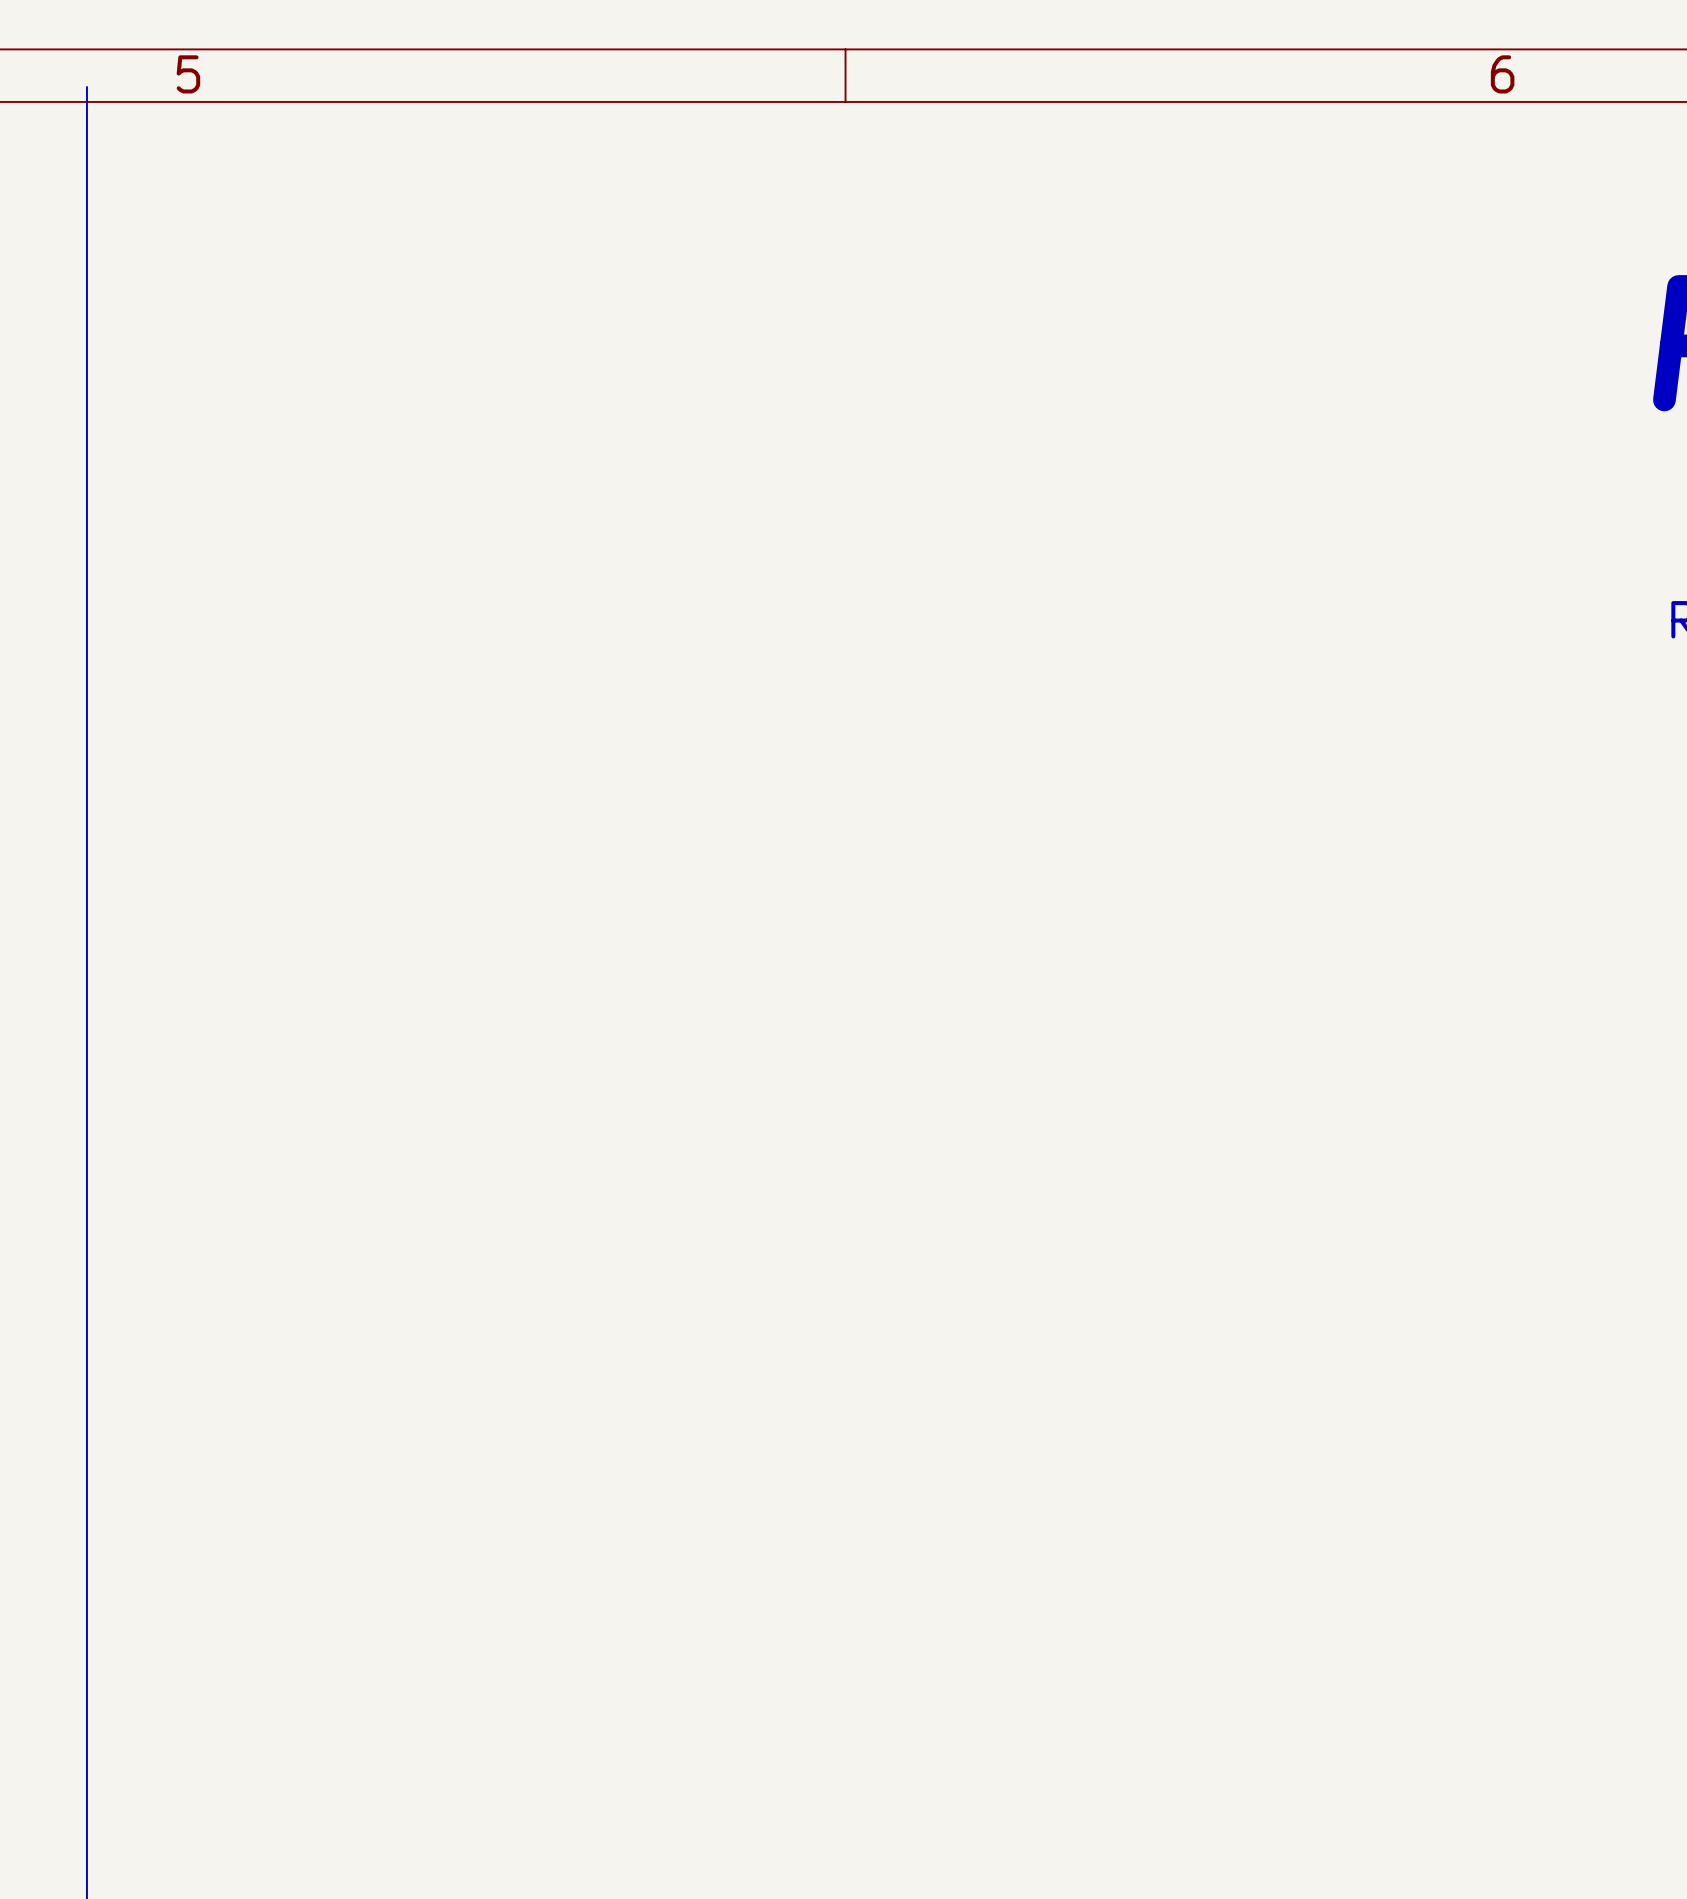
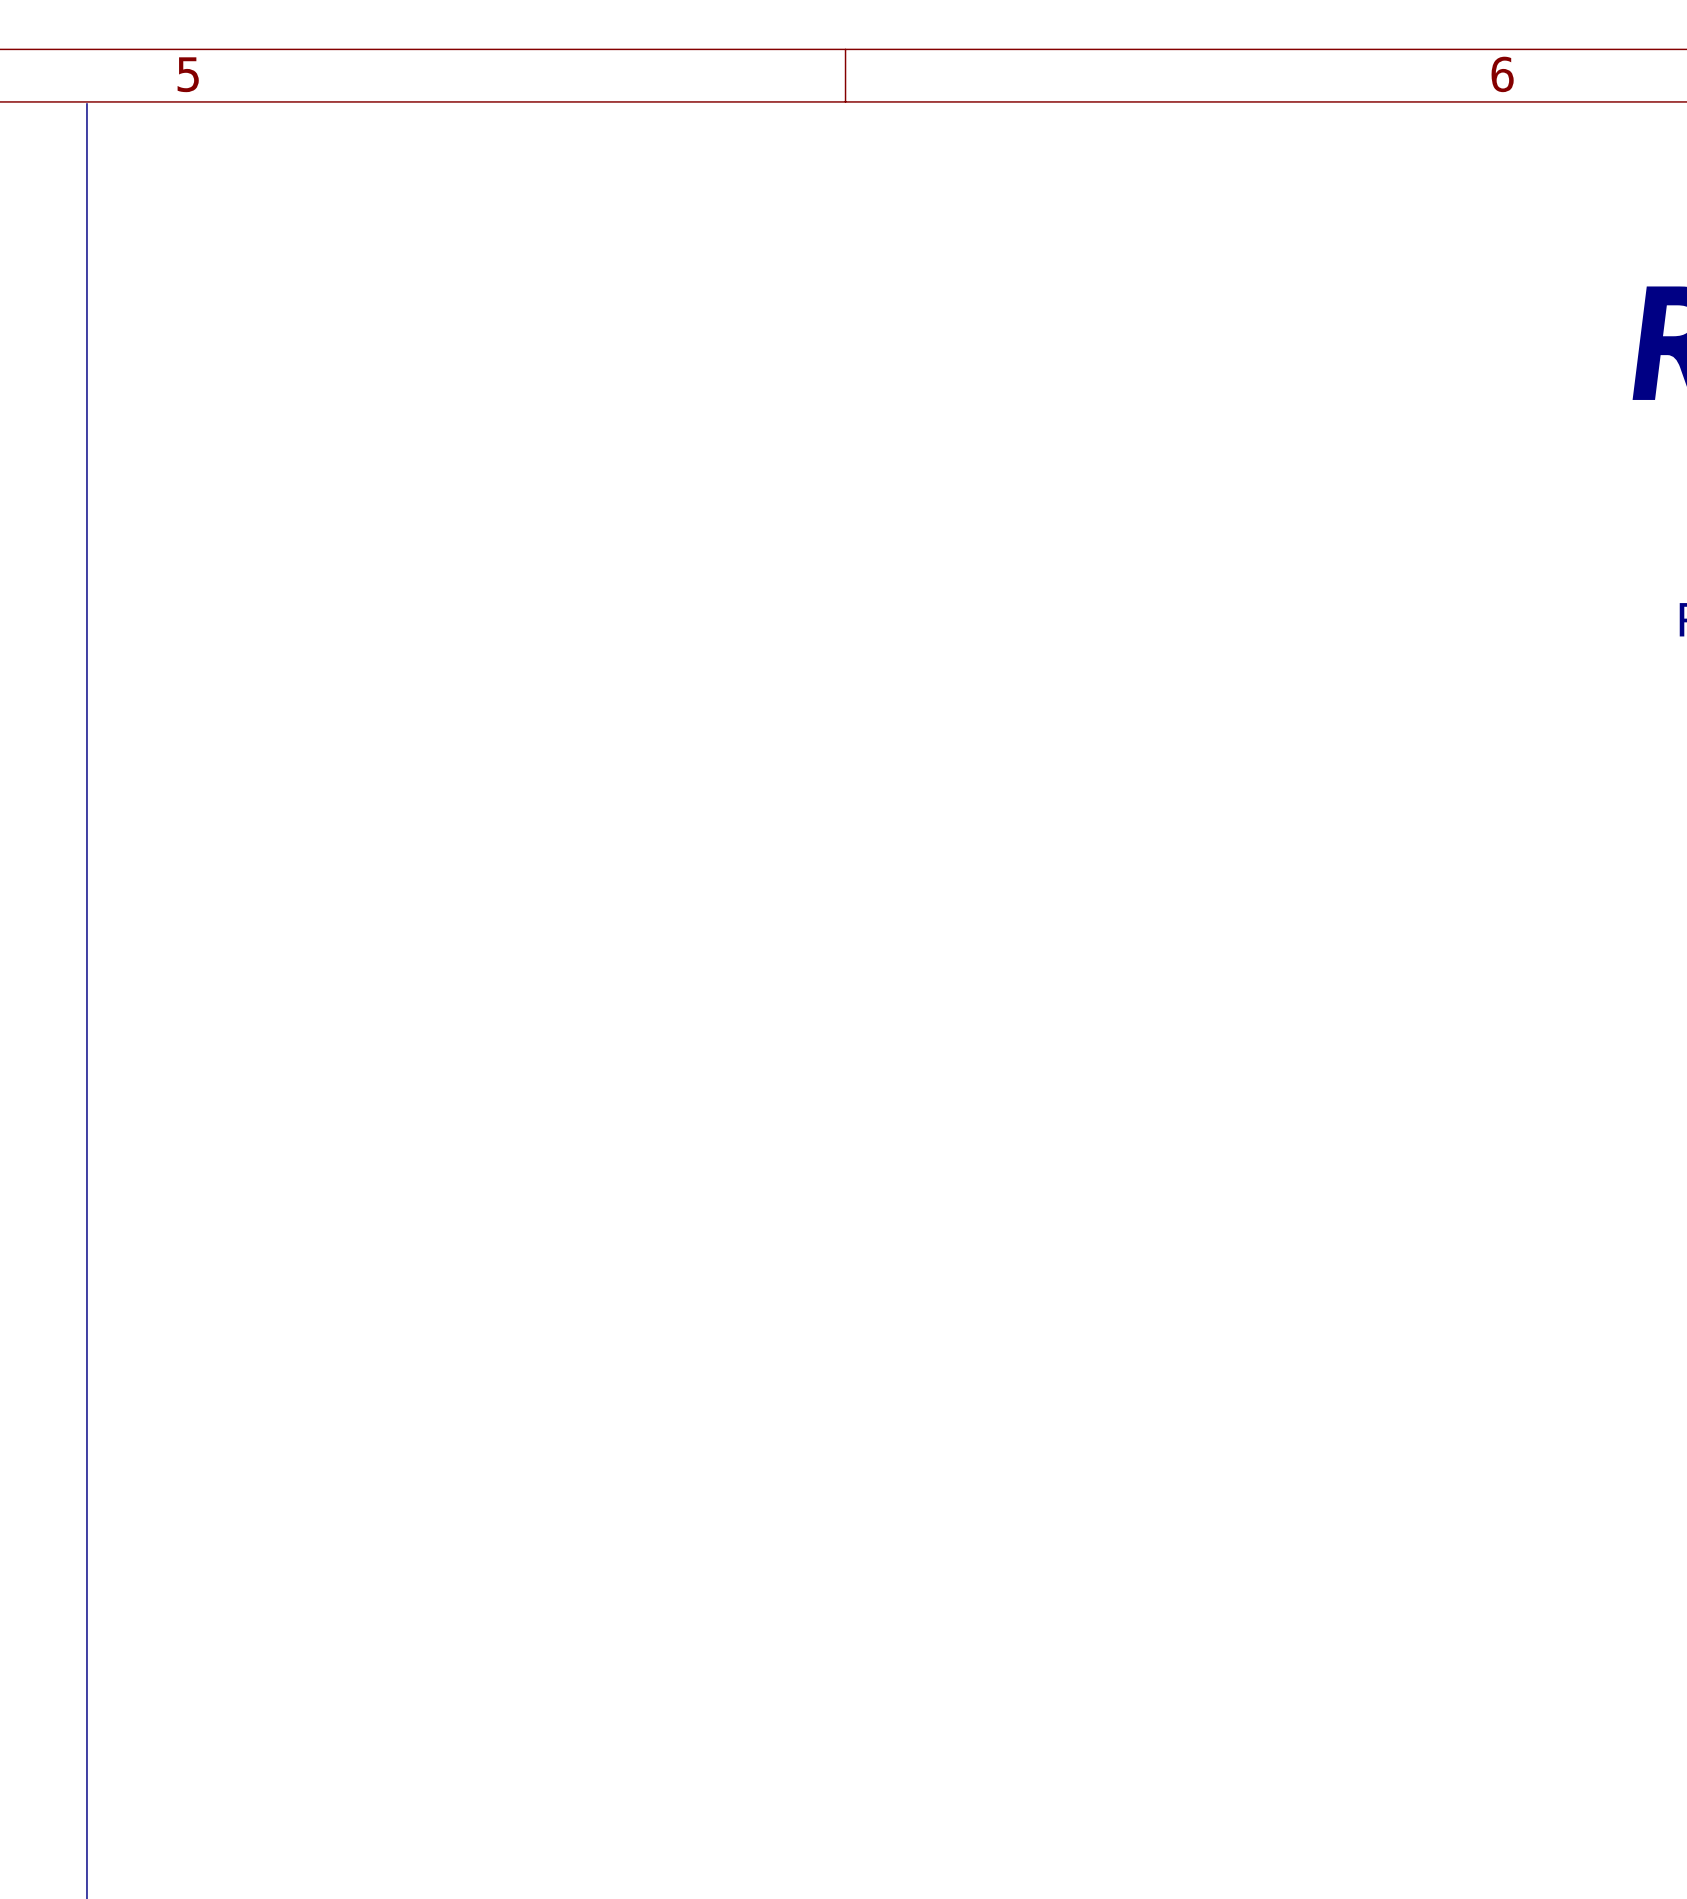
line: (86, 86) (86, 103) -> none

